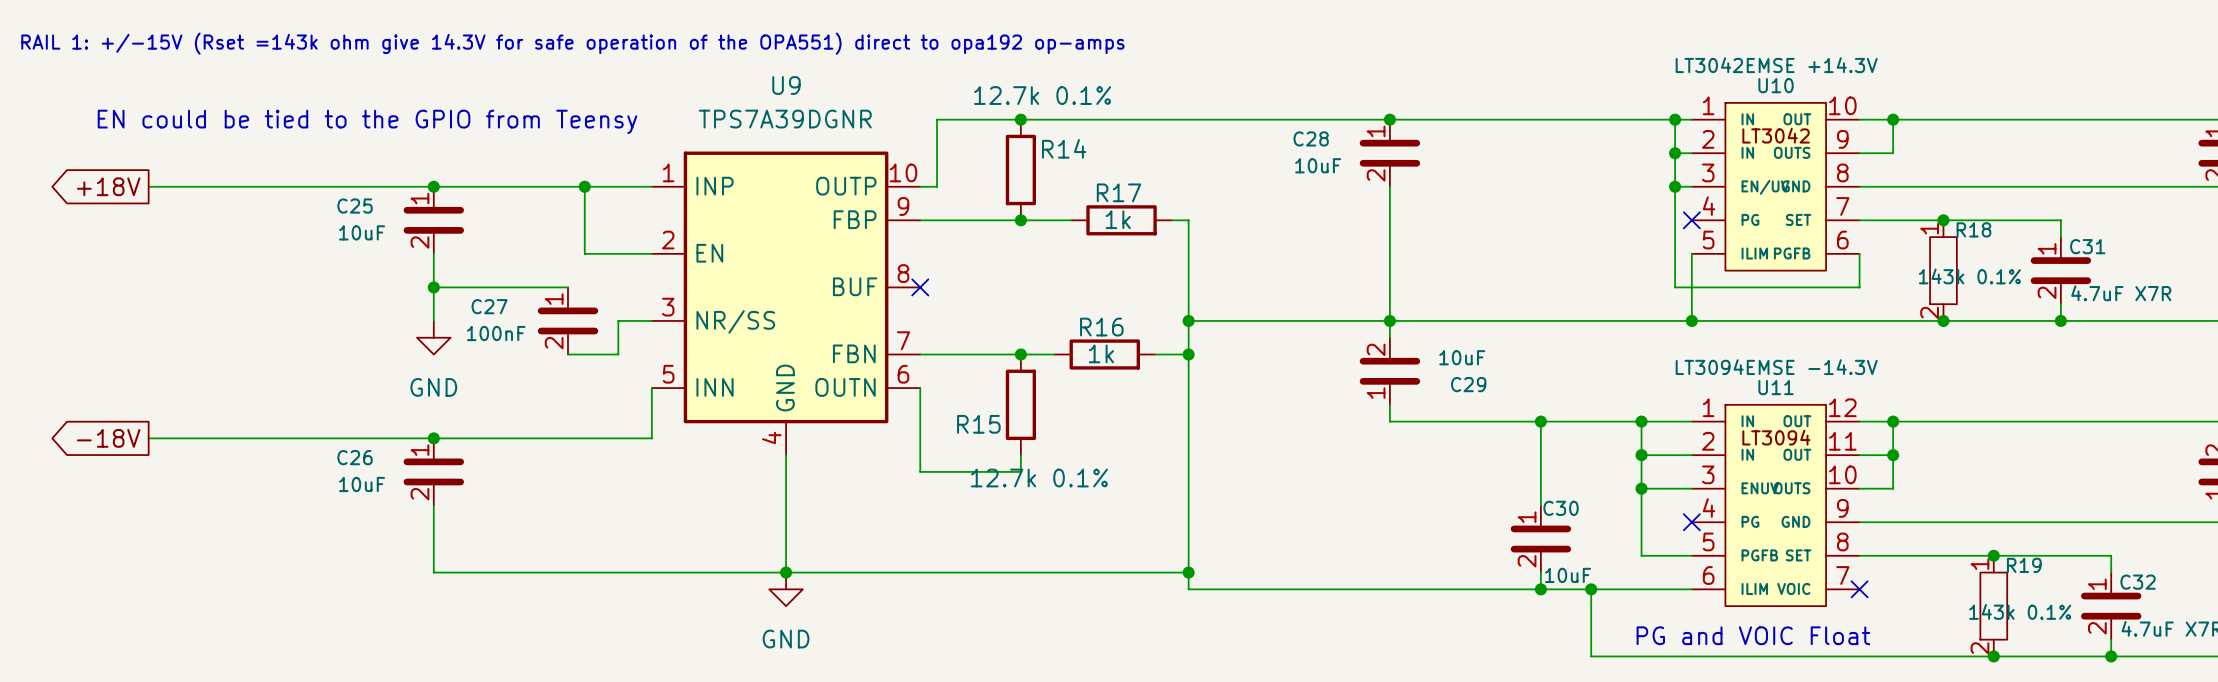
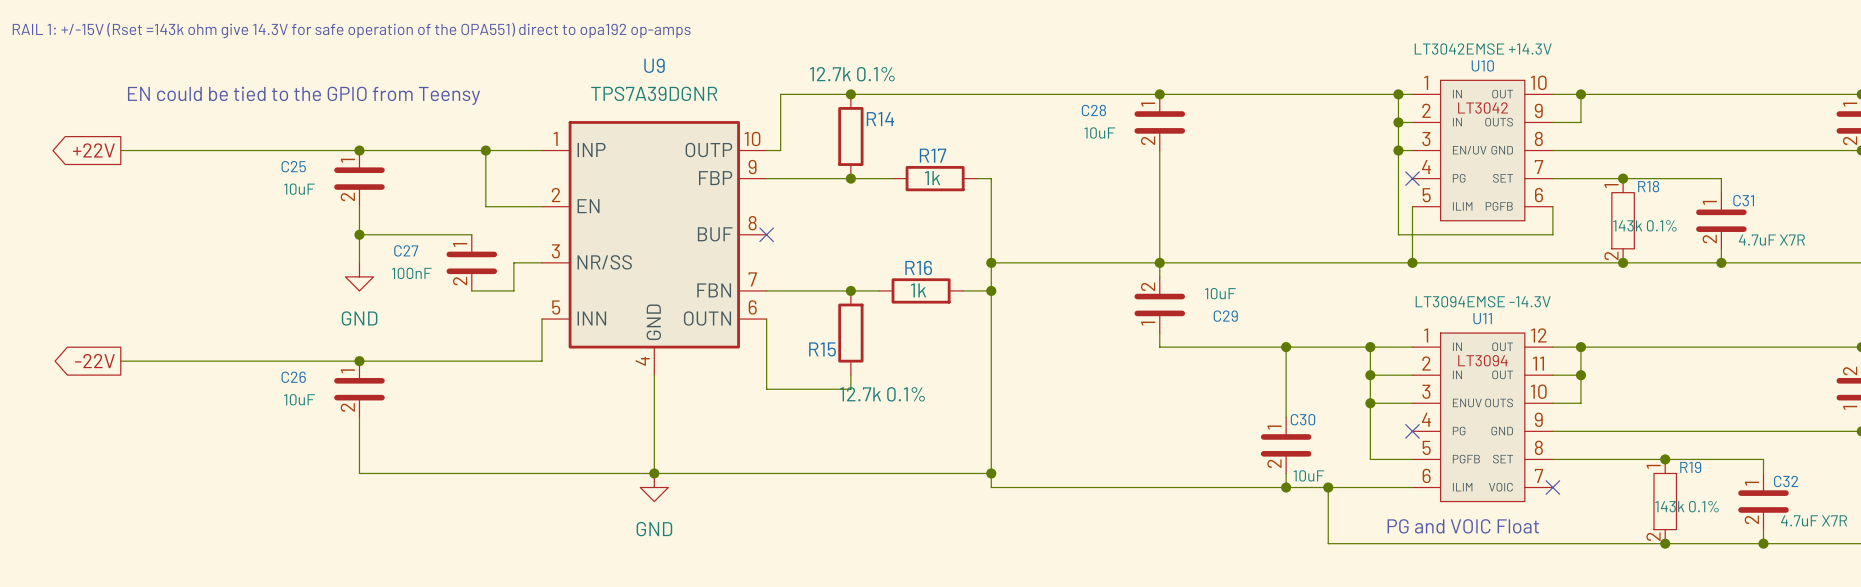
global label: +18V (108, 186) -> +22V (93, 150)
global label: -18V (108, 438) -> -22V (94, 361)

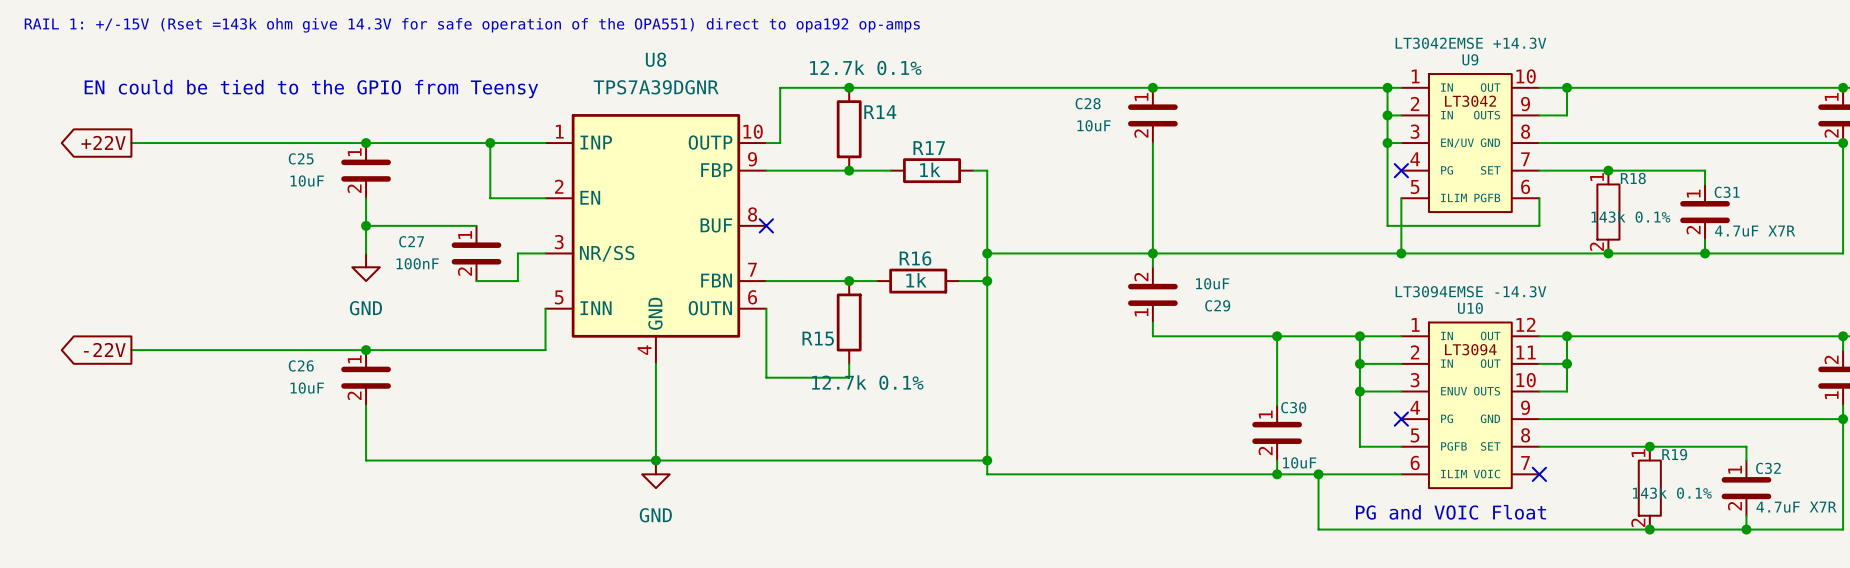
U9 name: U9 (654, 65) -> U8 (656, 59)
U10 name: U10 (1482, 65) -> U9 (1470, 59)
U11 name: U11 (1482, 318) -> U10 (1470, 308)

